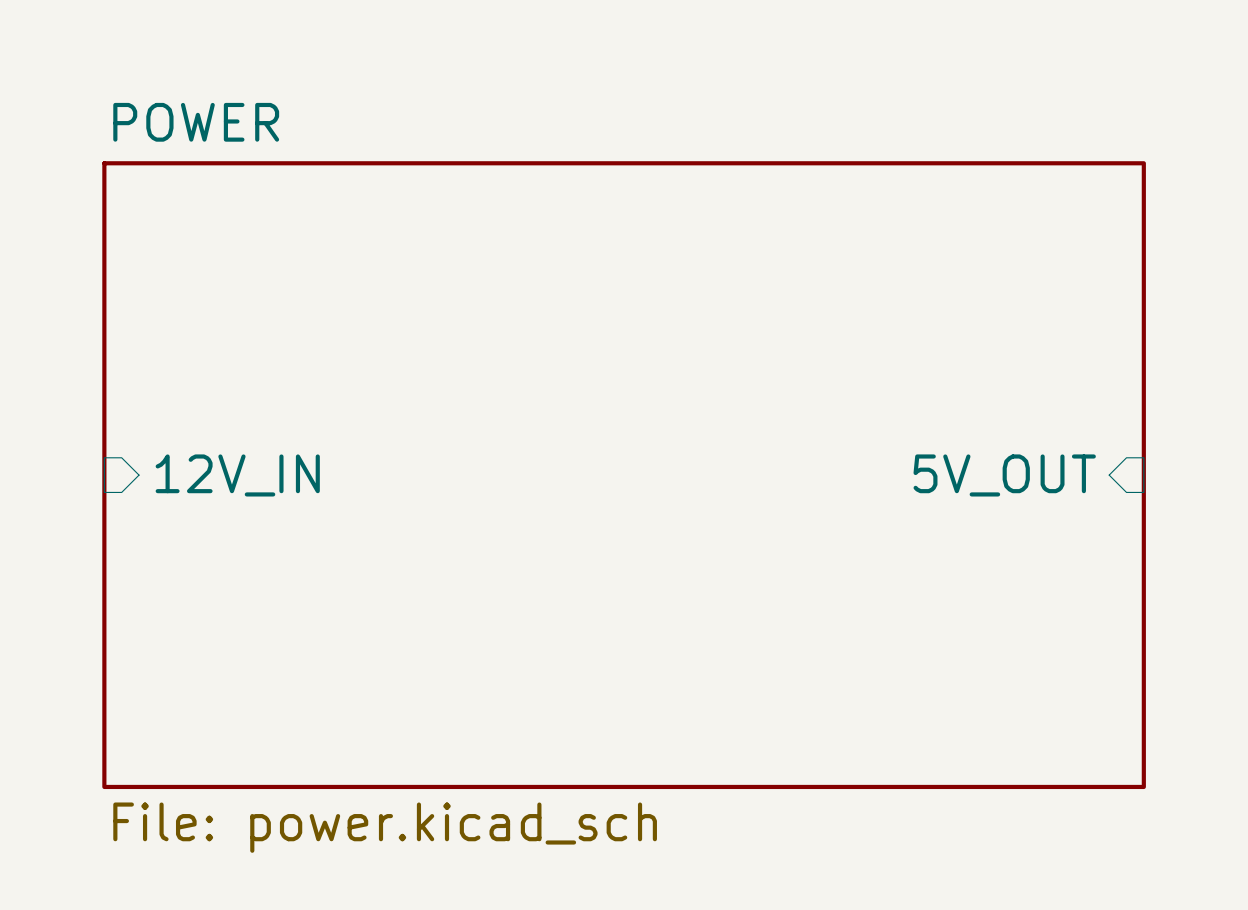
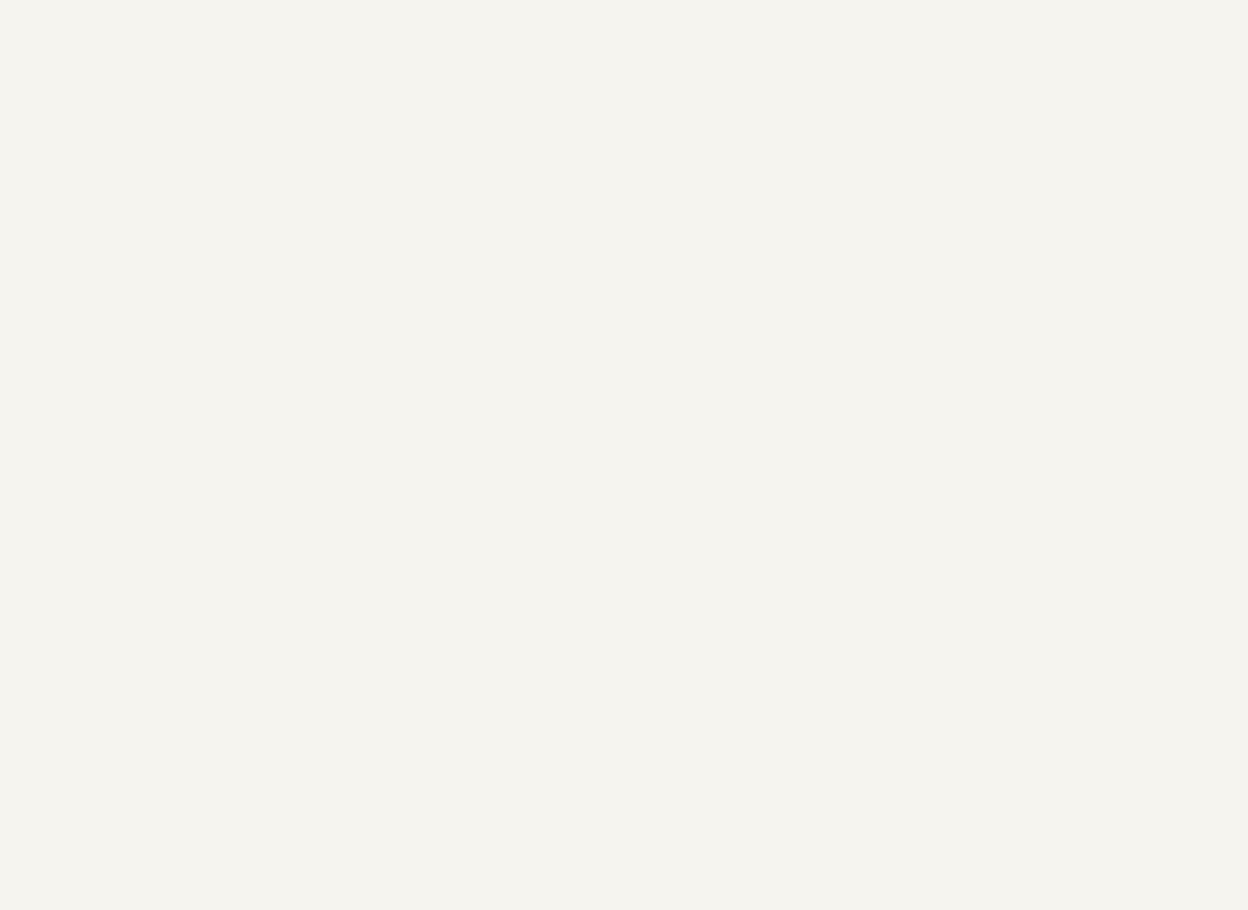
sheet pin: 12V_IN (237, 475) -> none
sheet POWER: File: power.kicad_sch (624, 475) -> none
sheet pin: 5V_OUT (1004, 475) -> none

